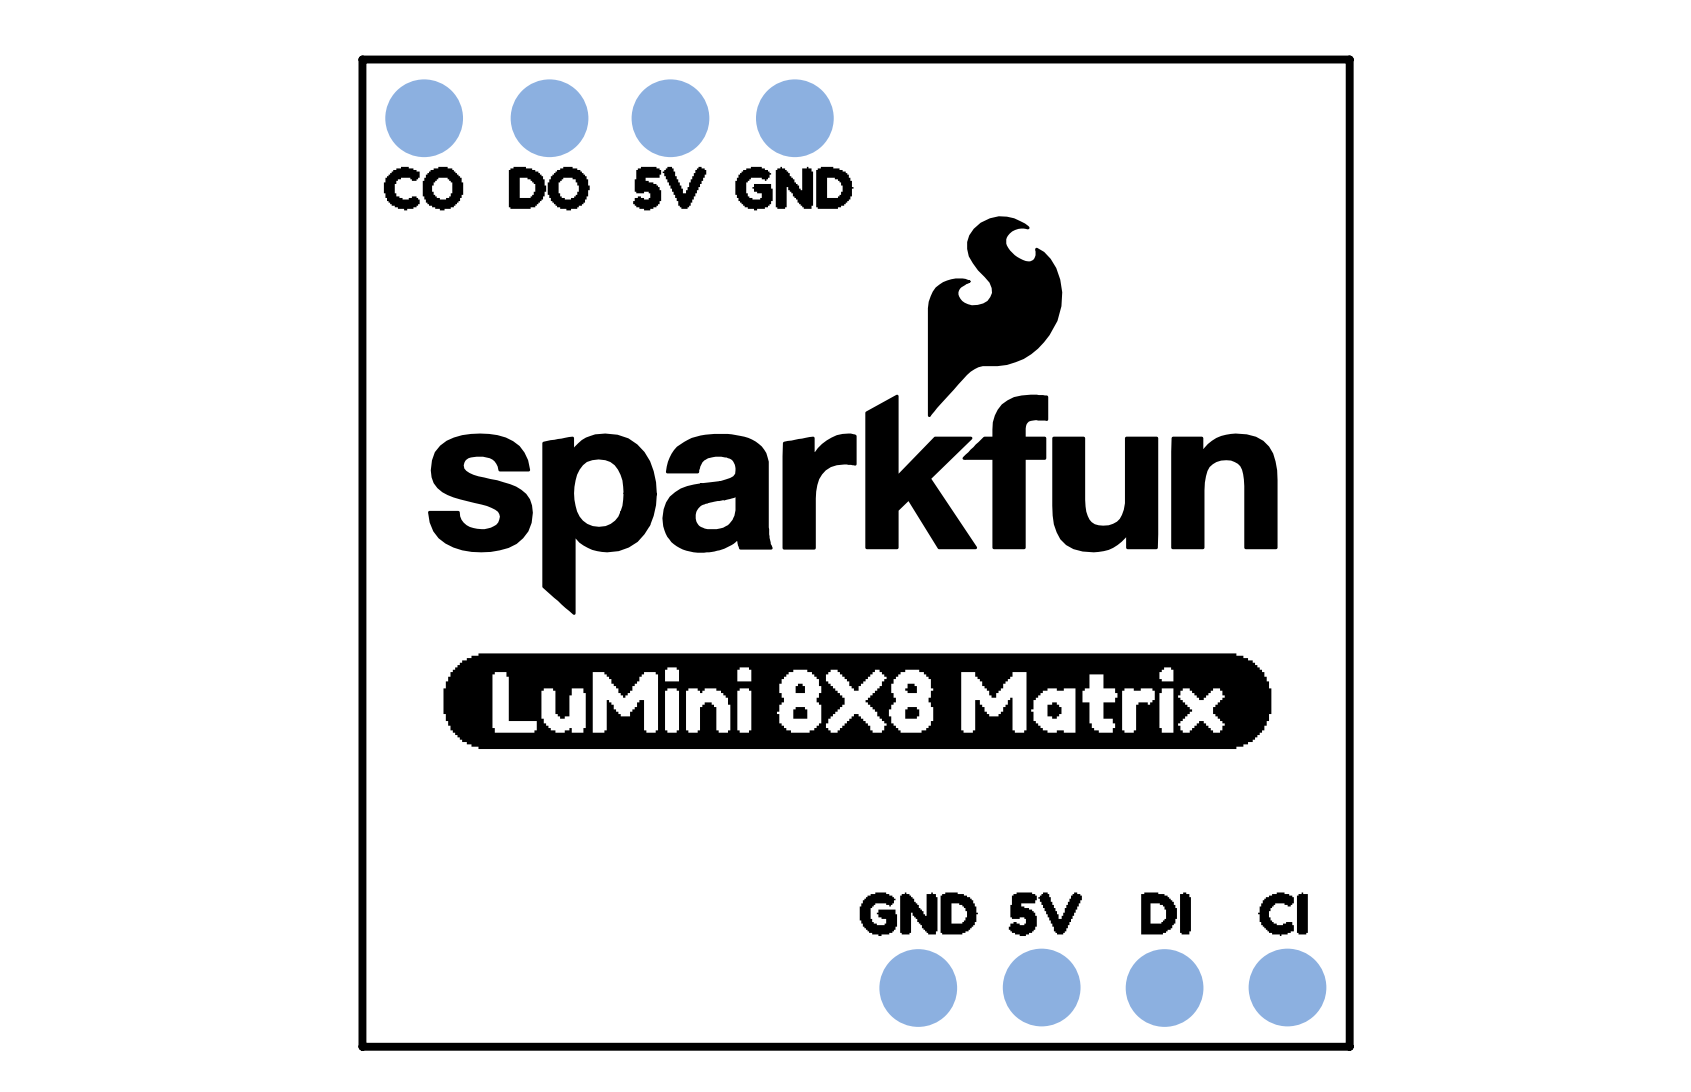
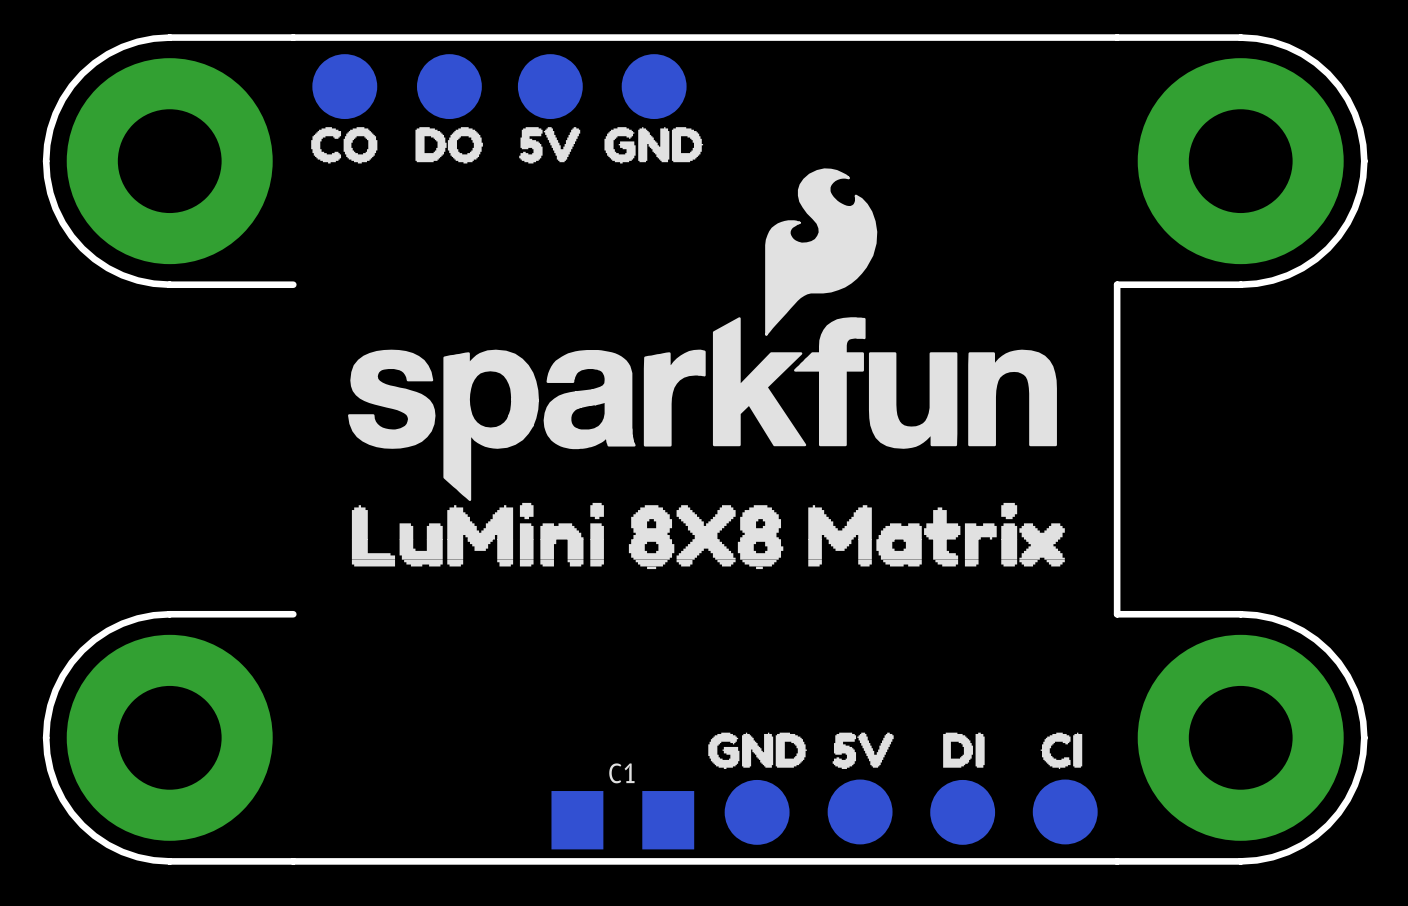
board edge: (362, 59) (362, 1046) -> (293, 614) (153, 615) (137, 618) (107, 630) (82, 650) (62, 676) (50, 705) (46, 737) (50, 769) (62, 799) (82, 825) (107, 844) (137, 857) (153, 860) (293, 861)
board edge: none -> (293, 37) (153, 38) (137, 41) (107, 54) (82, 73) (62, 99) (50, 129) (46, 161) (50, 193) (62, 222) (82, 248) (107, 268) (137, 280) (153, 283) (293, 284)
board edge: (1349, 59) (1349, 355) -> (1117, 37) (1256, 38) (1272, 41) (1302, 54) (1328, 73) (1347, 99) (1360, 129) (1364, 161) (1360, 193) (1347, 222) (1328, 248) (1302, 268) (1272, 280) (1256, 283) (1117, 284)
part: none -> (169, 161)
part: none -> (1240, 161)
drawing: none -> [351, 502, 1065, 570]
drawing: [443, 653, 1272, 750] -> none
board edge: (1349, 750) (1349, 1046) -> (1117, 614) (1256, 615) (1272, 618) (1302, 630) (1328, 650) (1347, 676) (1360, 705) (1364, 737) (1360, 769) (1347, 799) (1328, 825) (1302, 844) (1272, 857) (1256, 860) (1117, 861)
part: none -> (169, 737)
part: none -> (1240, 737)
C1: none -> (622, 820)

